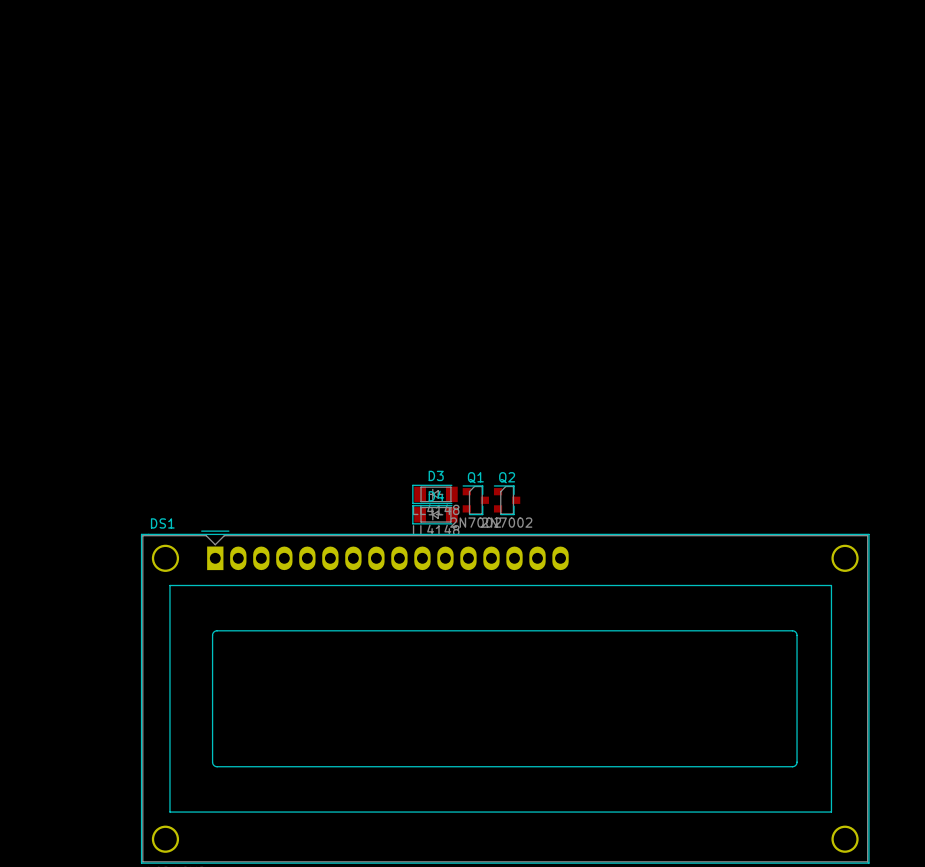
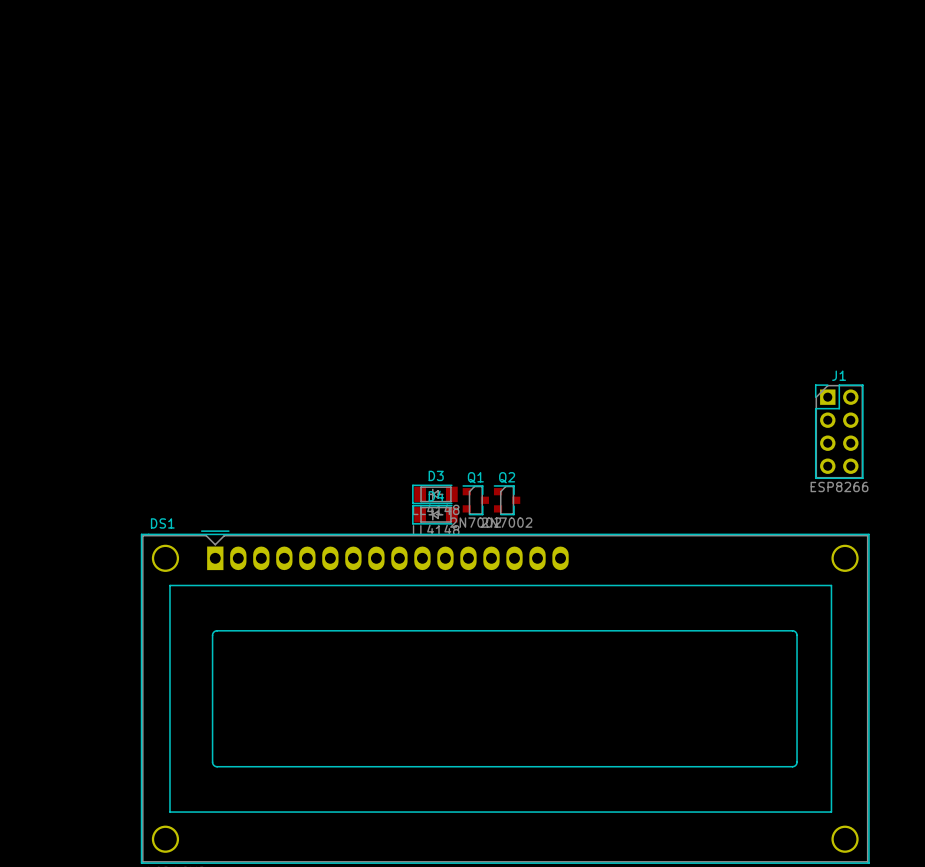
J1: none -> ESP8266 (839, 431)

